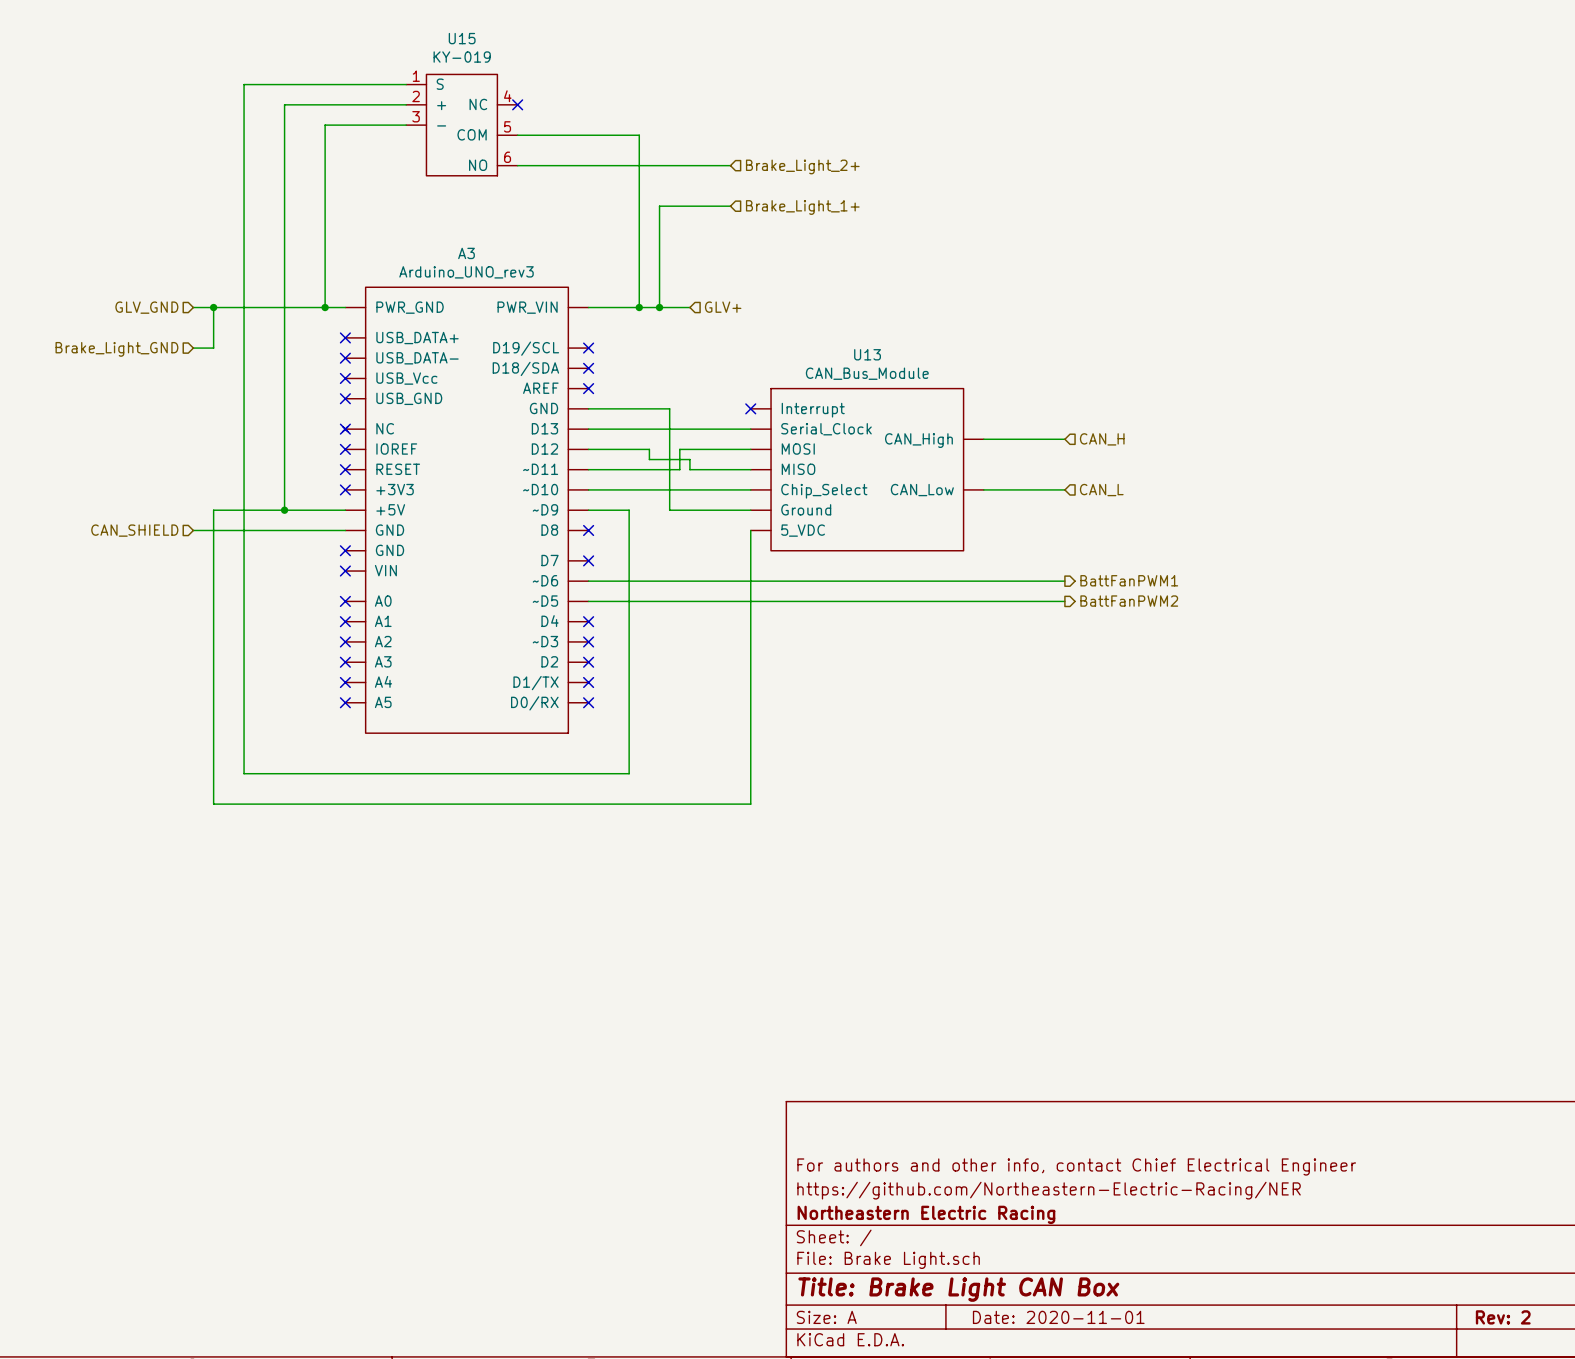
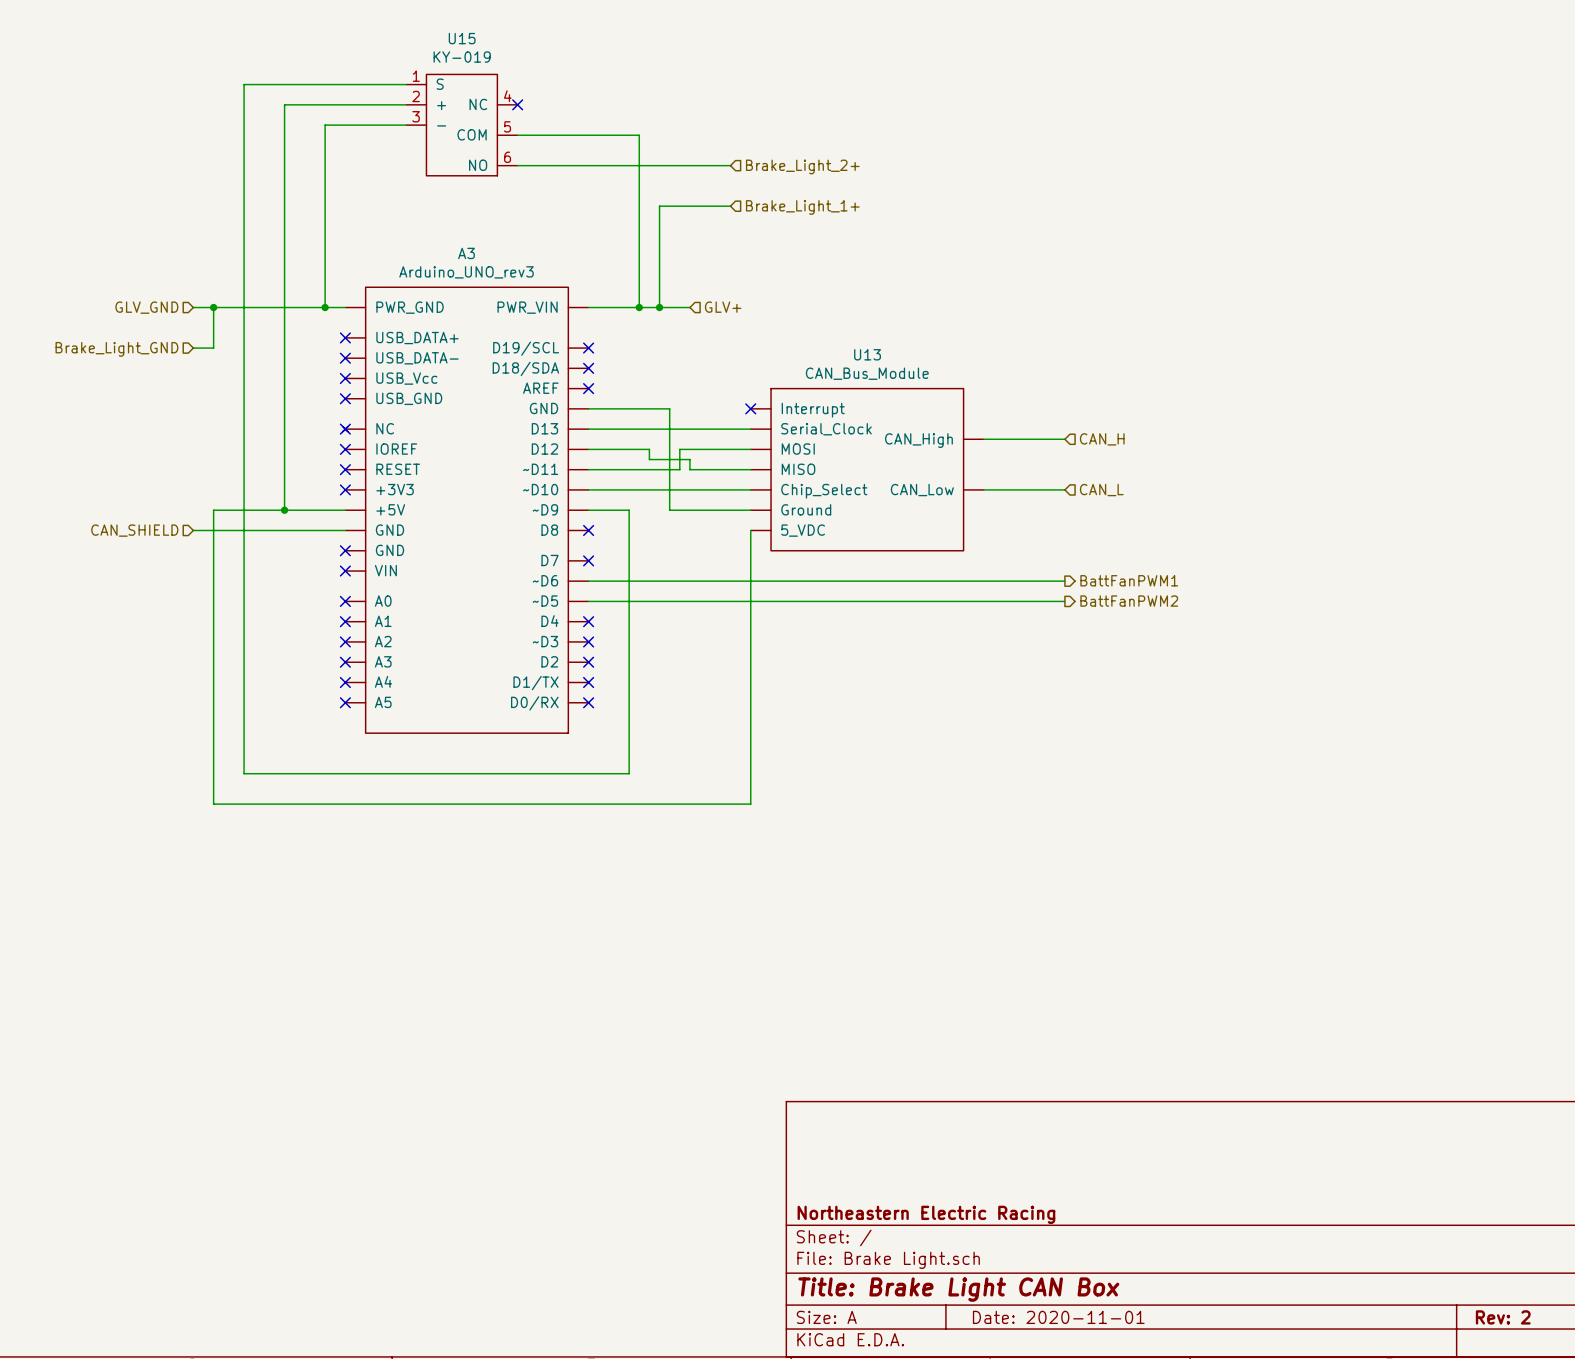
title block: For authors and other info, contact Chief Electrical Engineer (1076, 1166) -> none
title block: https://github.com/Northeastern-Electric-Racing/NER (1049, 1190) -> none

